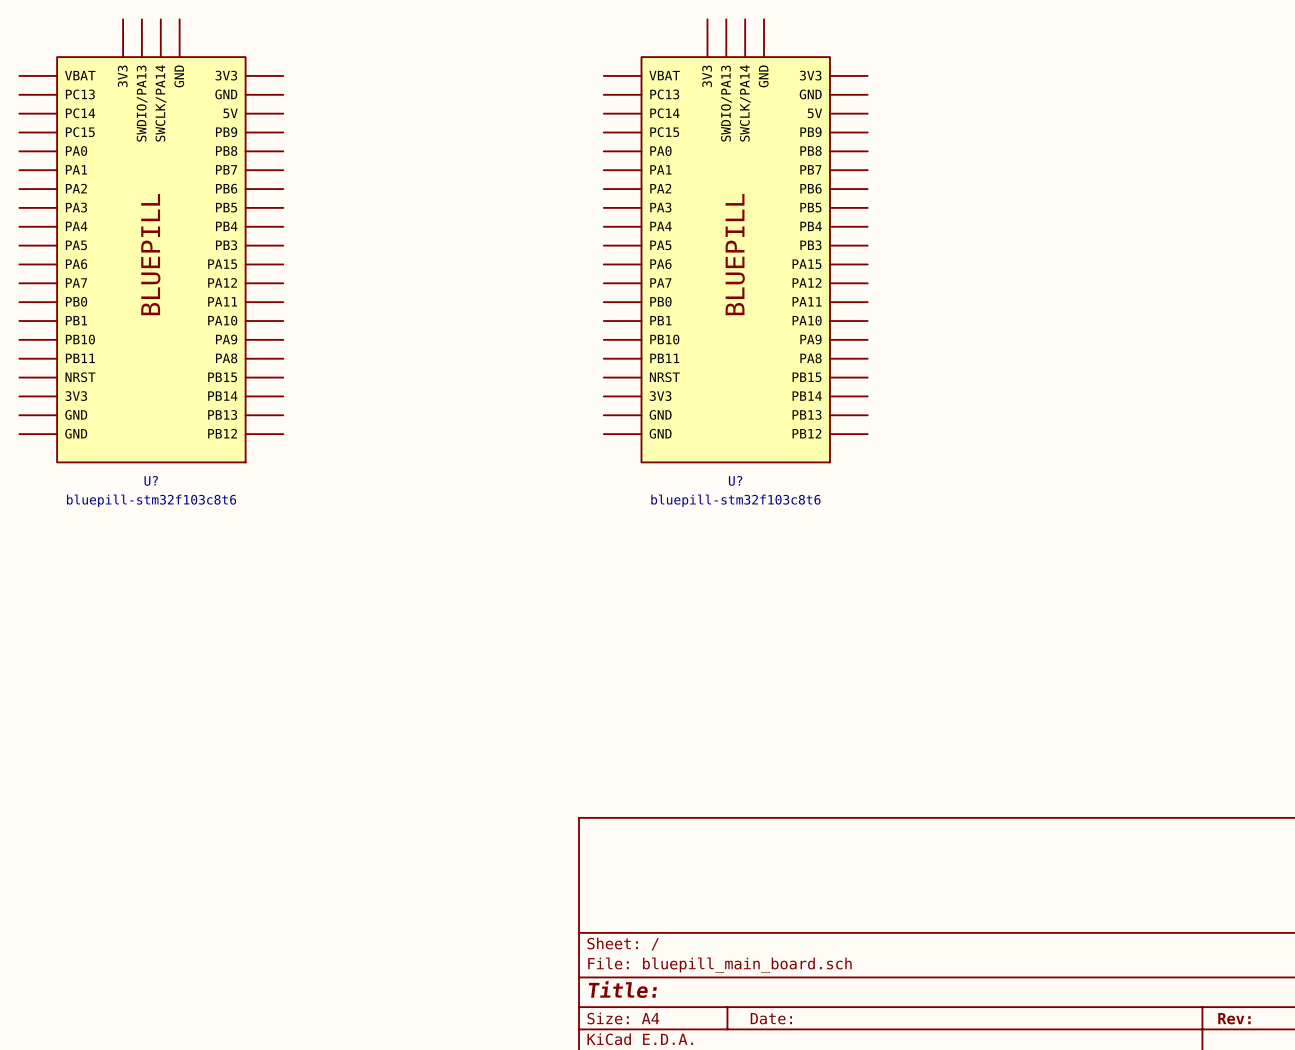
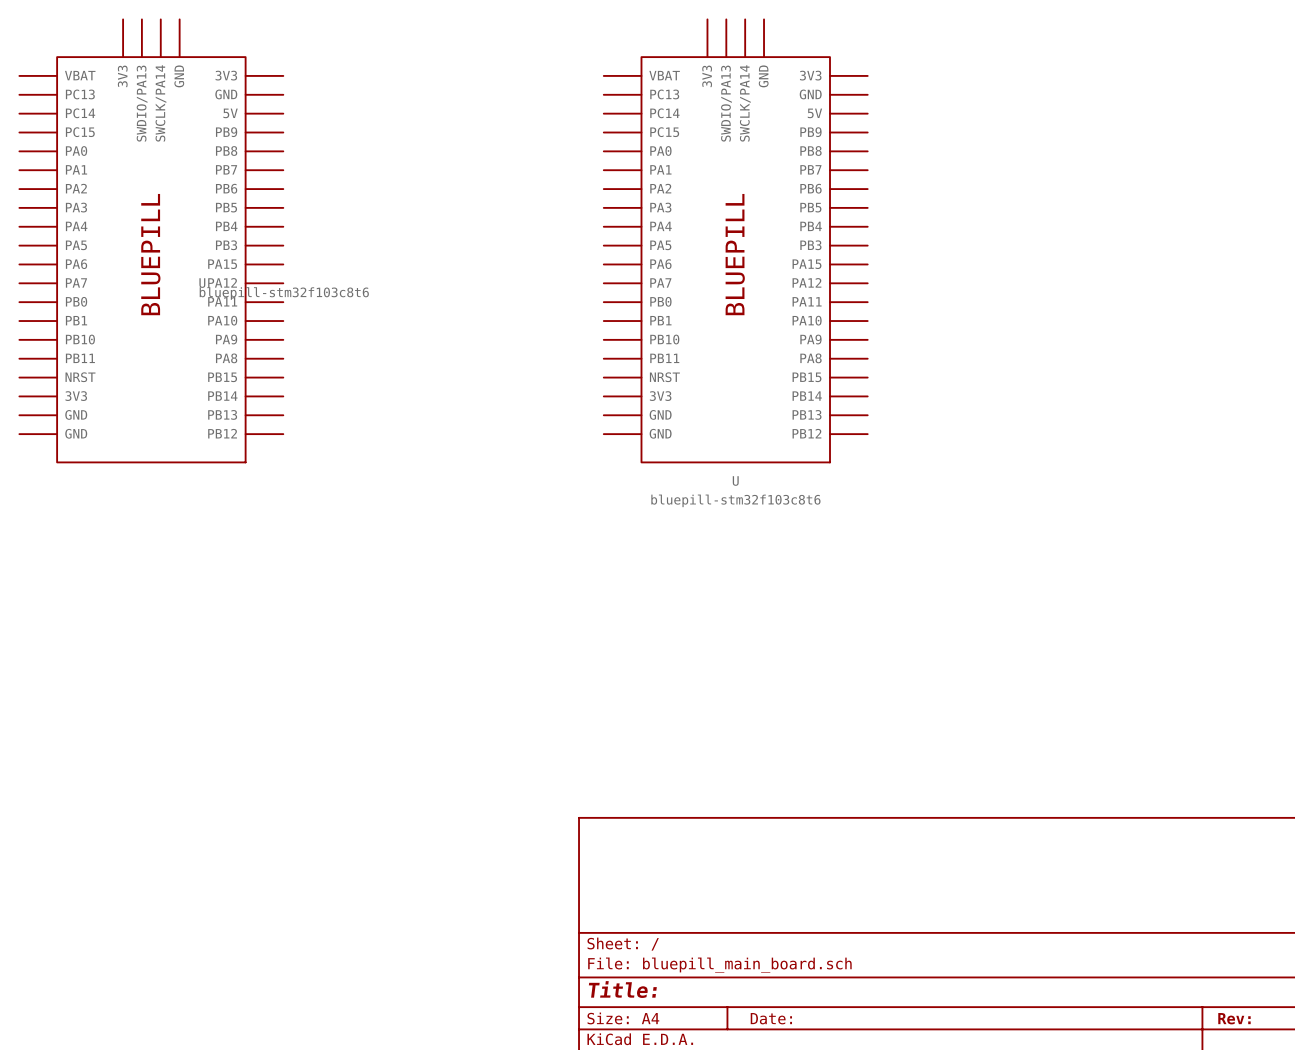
U? name: U? (151, 480) -> U (202, 283)
U? name: U? (735, 480) -> U (735, 480)
U? value position: bluepill-stm32f103c8t6 (151, 500) -> bluepill-stm32f103c8t6 (284, 293)

